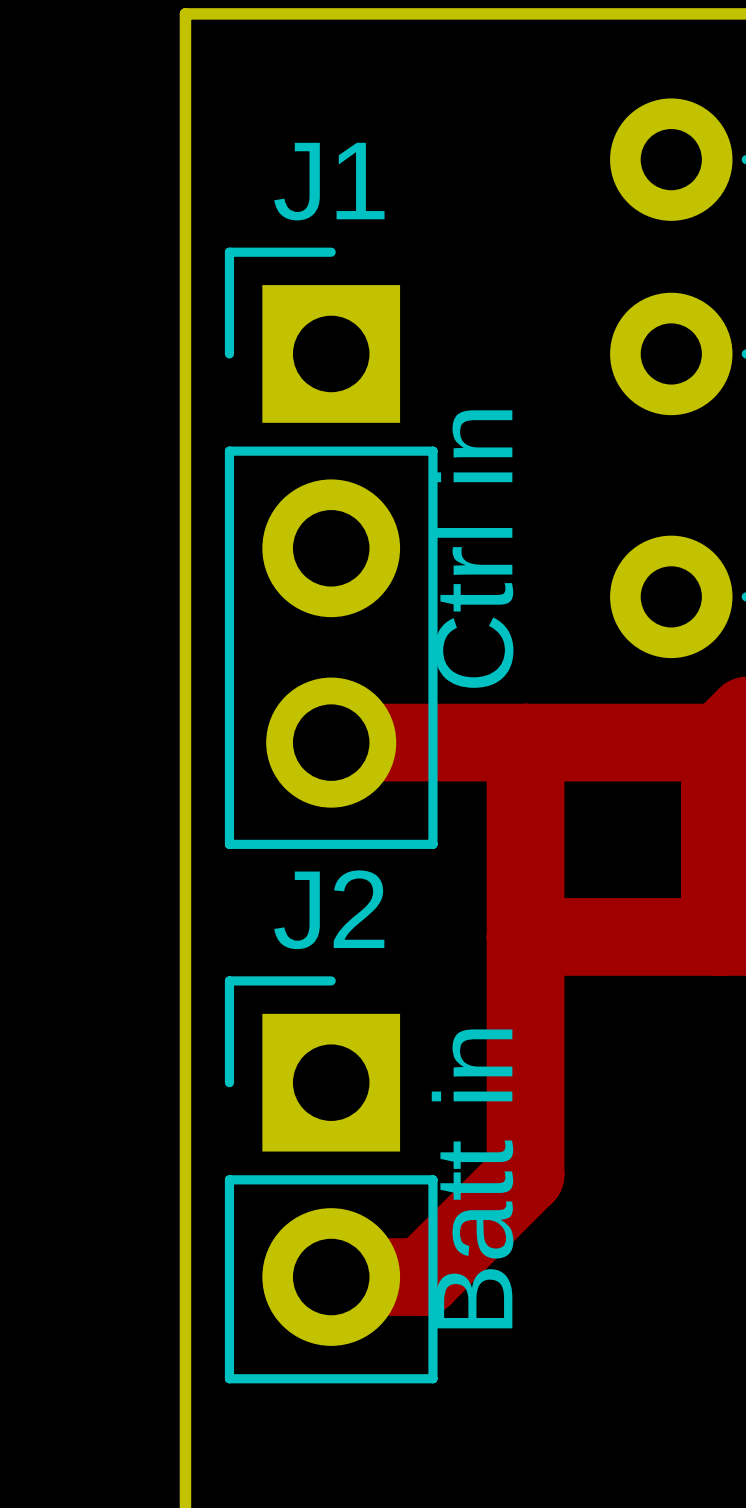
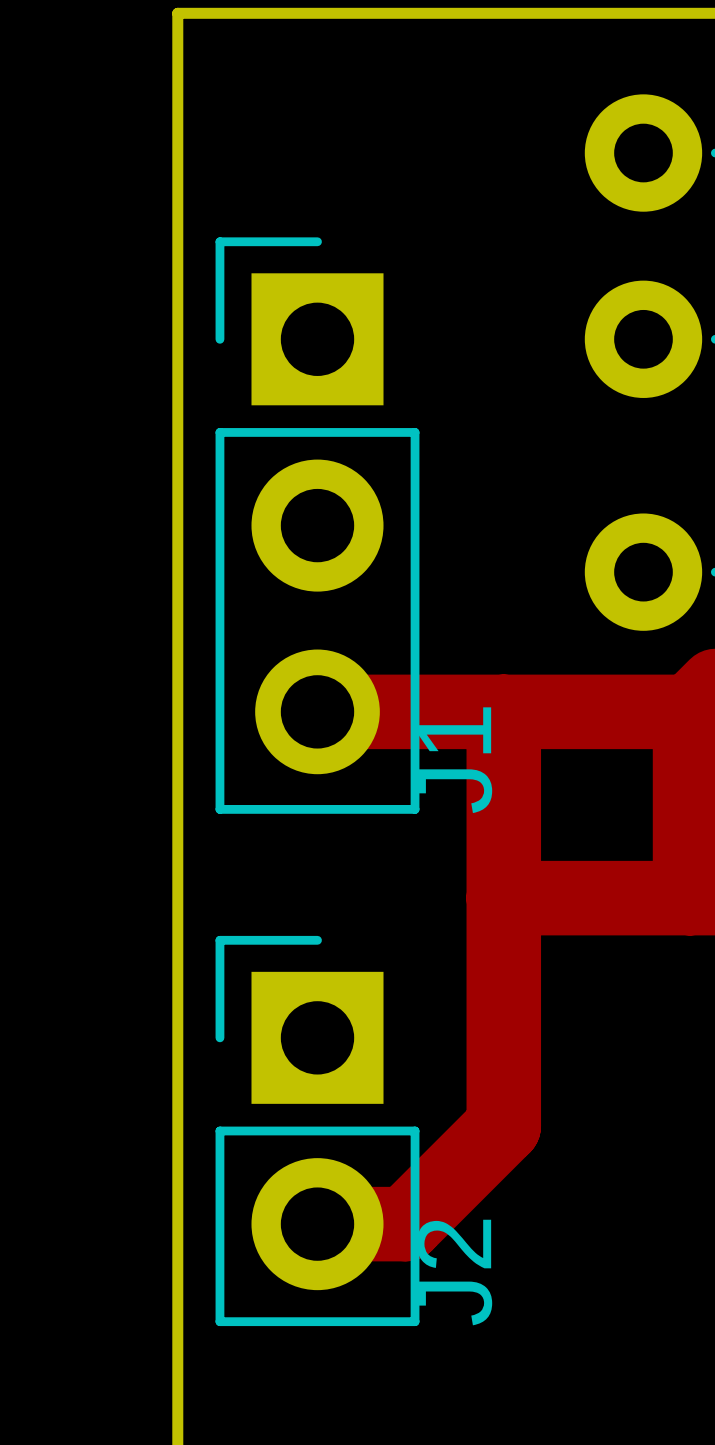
J1 name rotation: 0° (329, 181) -> 90° counterclockwise (454, 760)
J1 name position: J1 (329, 181) -> J1 (454, 760)
text: Ctrl in (472, 549) -> none
J2 name rotation: 0° (329, 909) -> 90° counterclockwise (454, 1272)
J2 name position: J2 (329, 909) -> J2 (454, 1272)
text: Batt in (472, 1178) -> none

